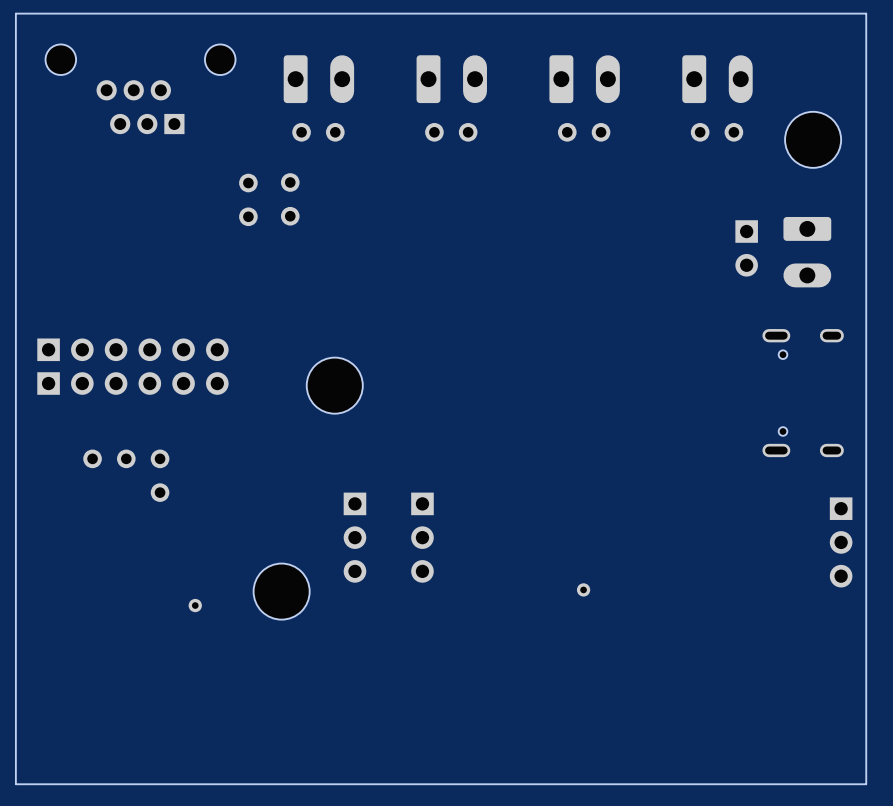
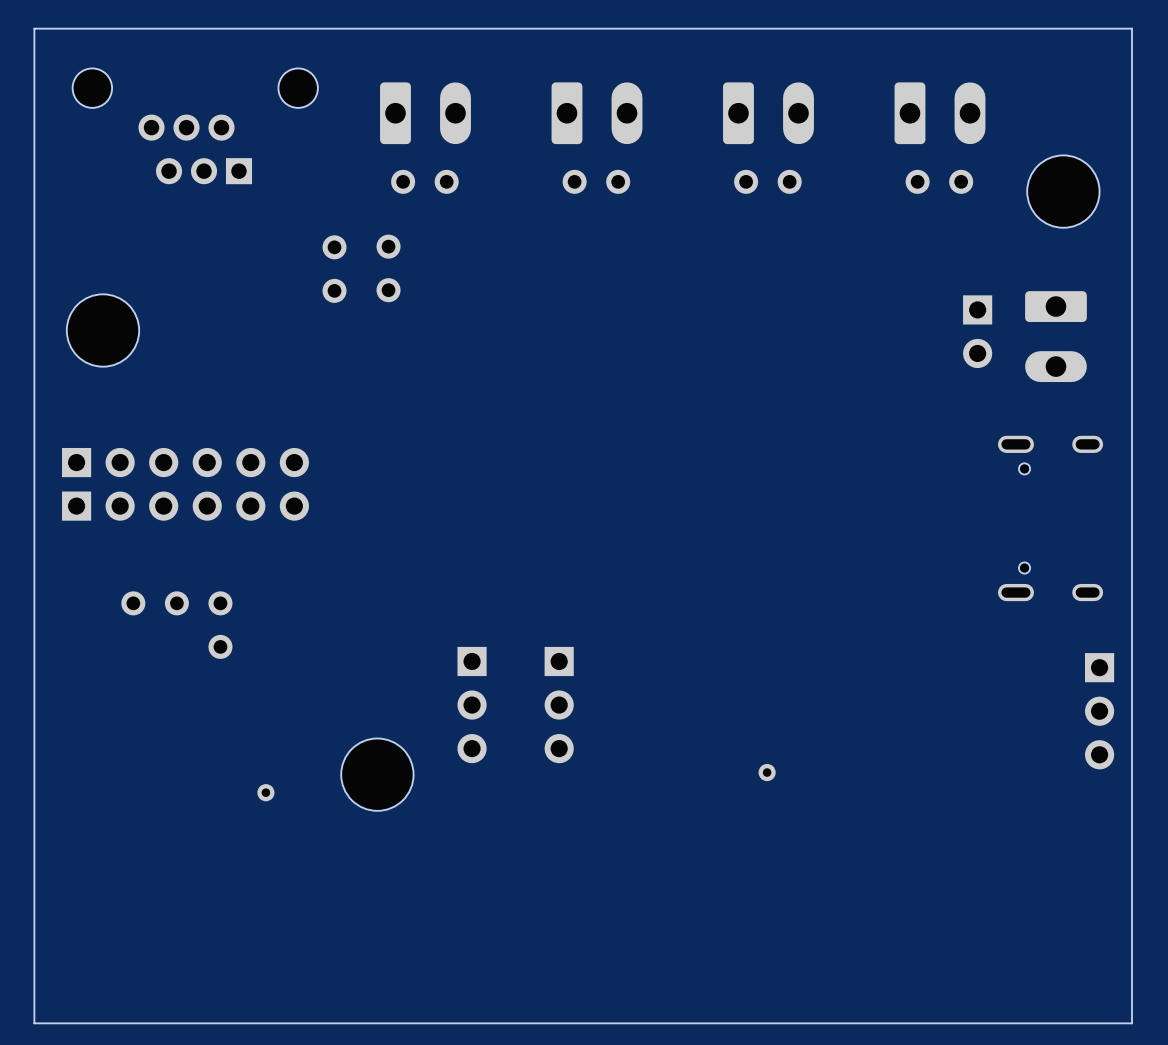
part position: (334, 385) -> (102, 330)

